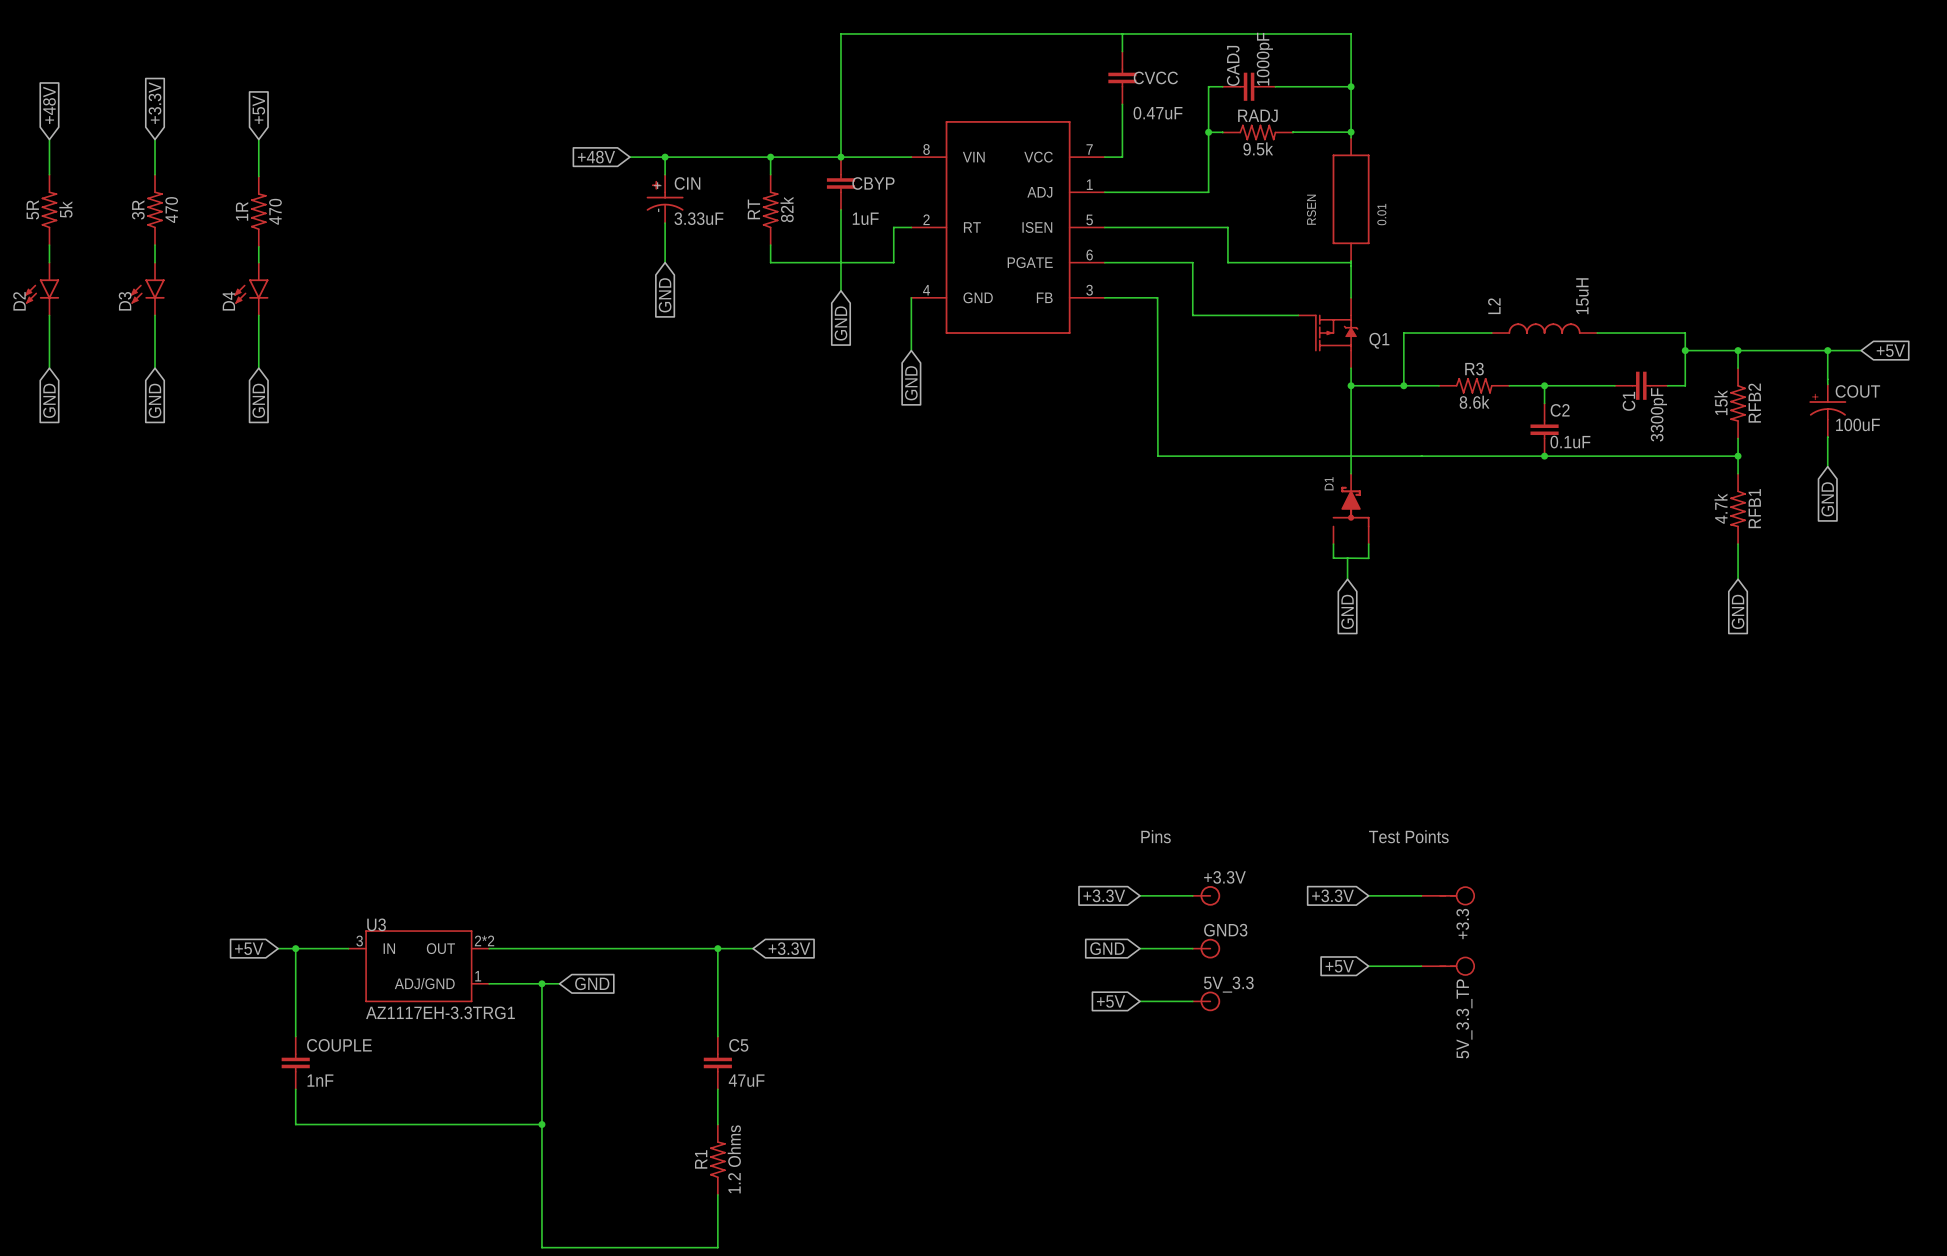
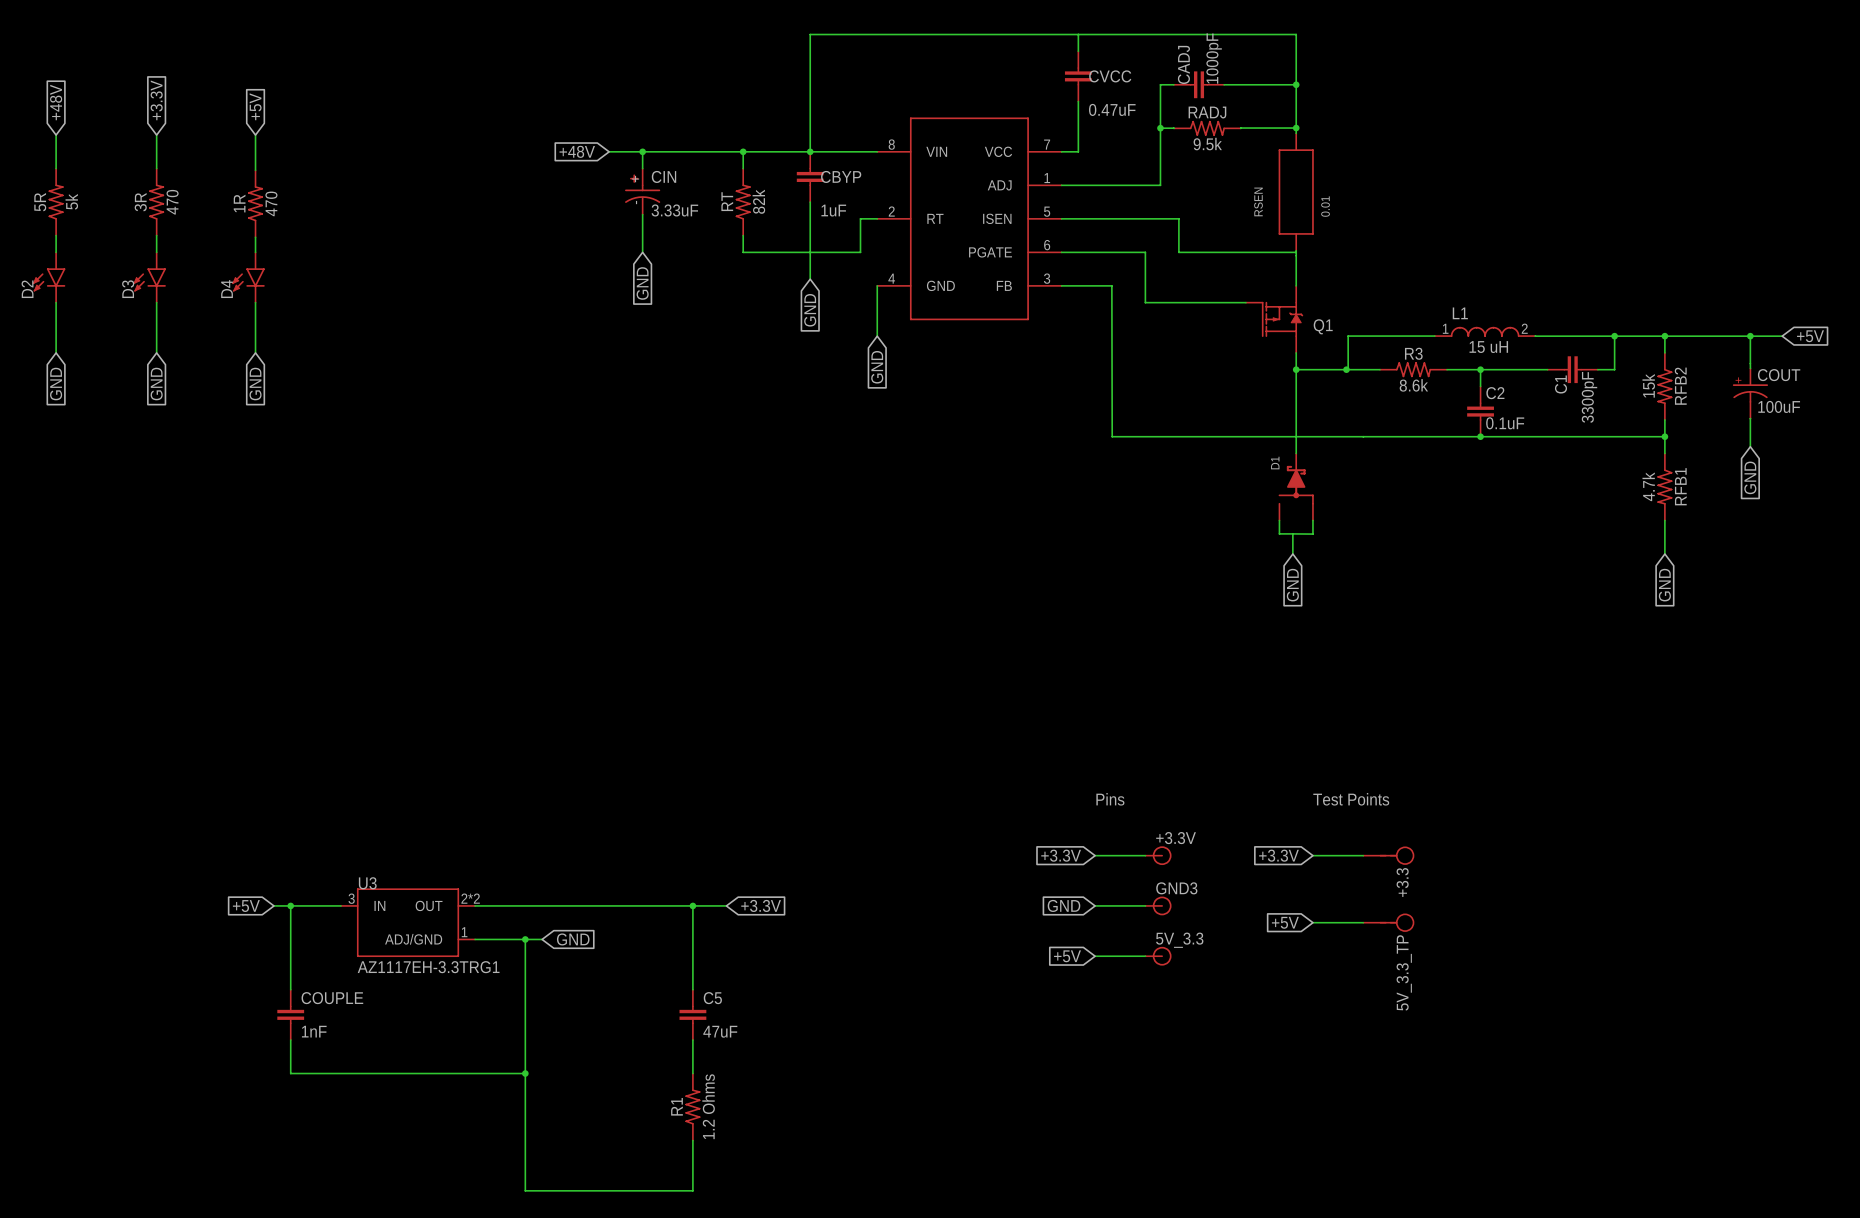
L2: 15uH (1544, 328) -> none
wire: (1491, 333) (1403, 333) (1403, 385) -> none
wire: (1597, 333) (1685, 333) (1685, 350) -> (1535, 336) (1614, 336)
L1: none -> (1485, 331)
wire: none -> (1434, 336) (1348, 336) (1348, 369)

